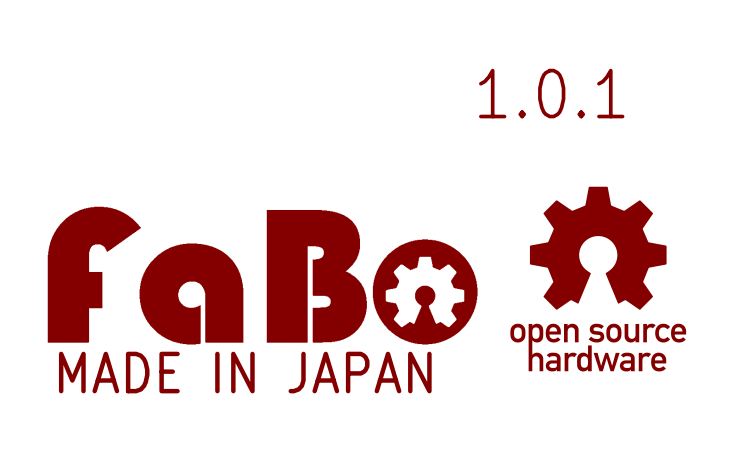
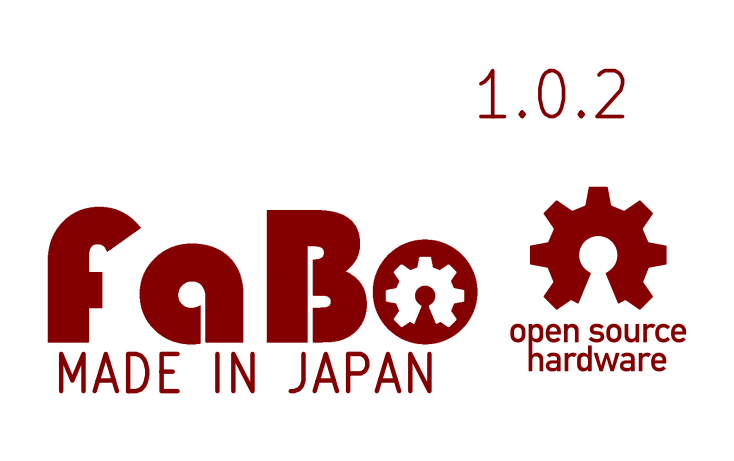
text: 1.0.1 (551, 93) -> 1.0.2 (551, 93)

